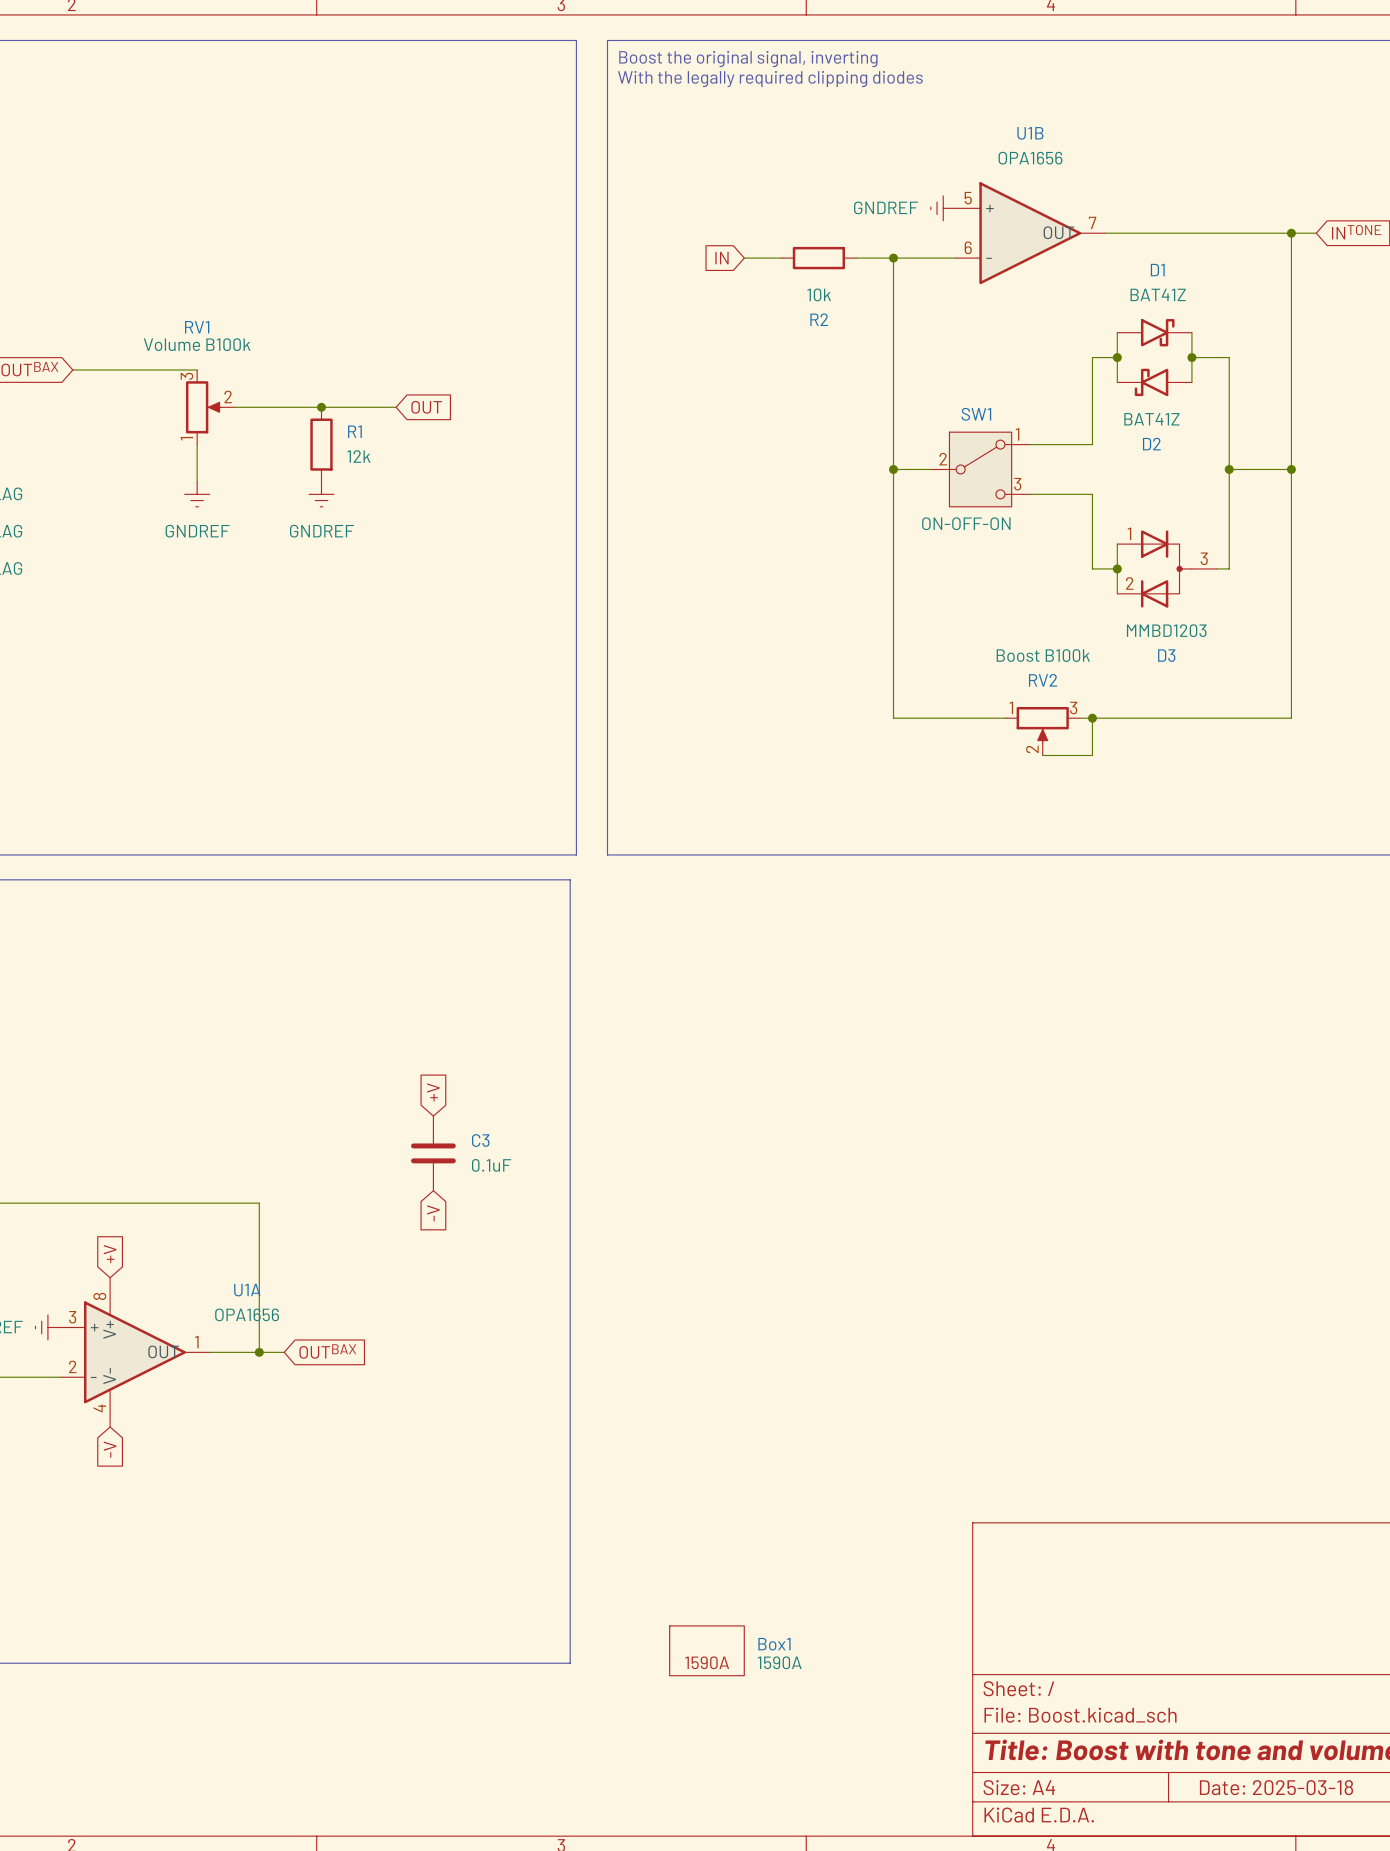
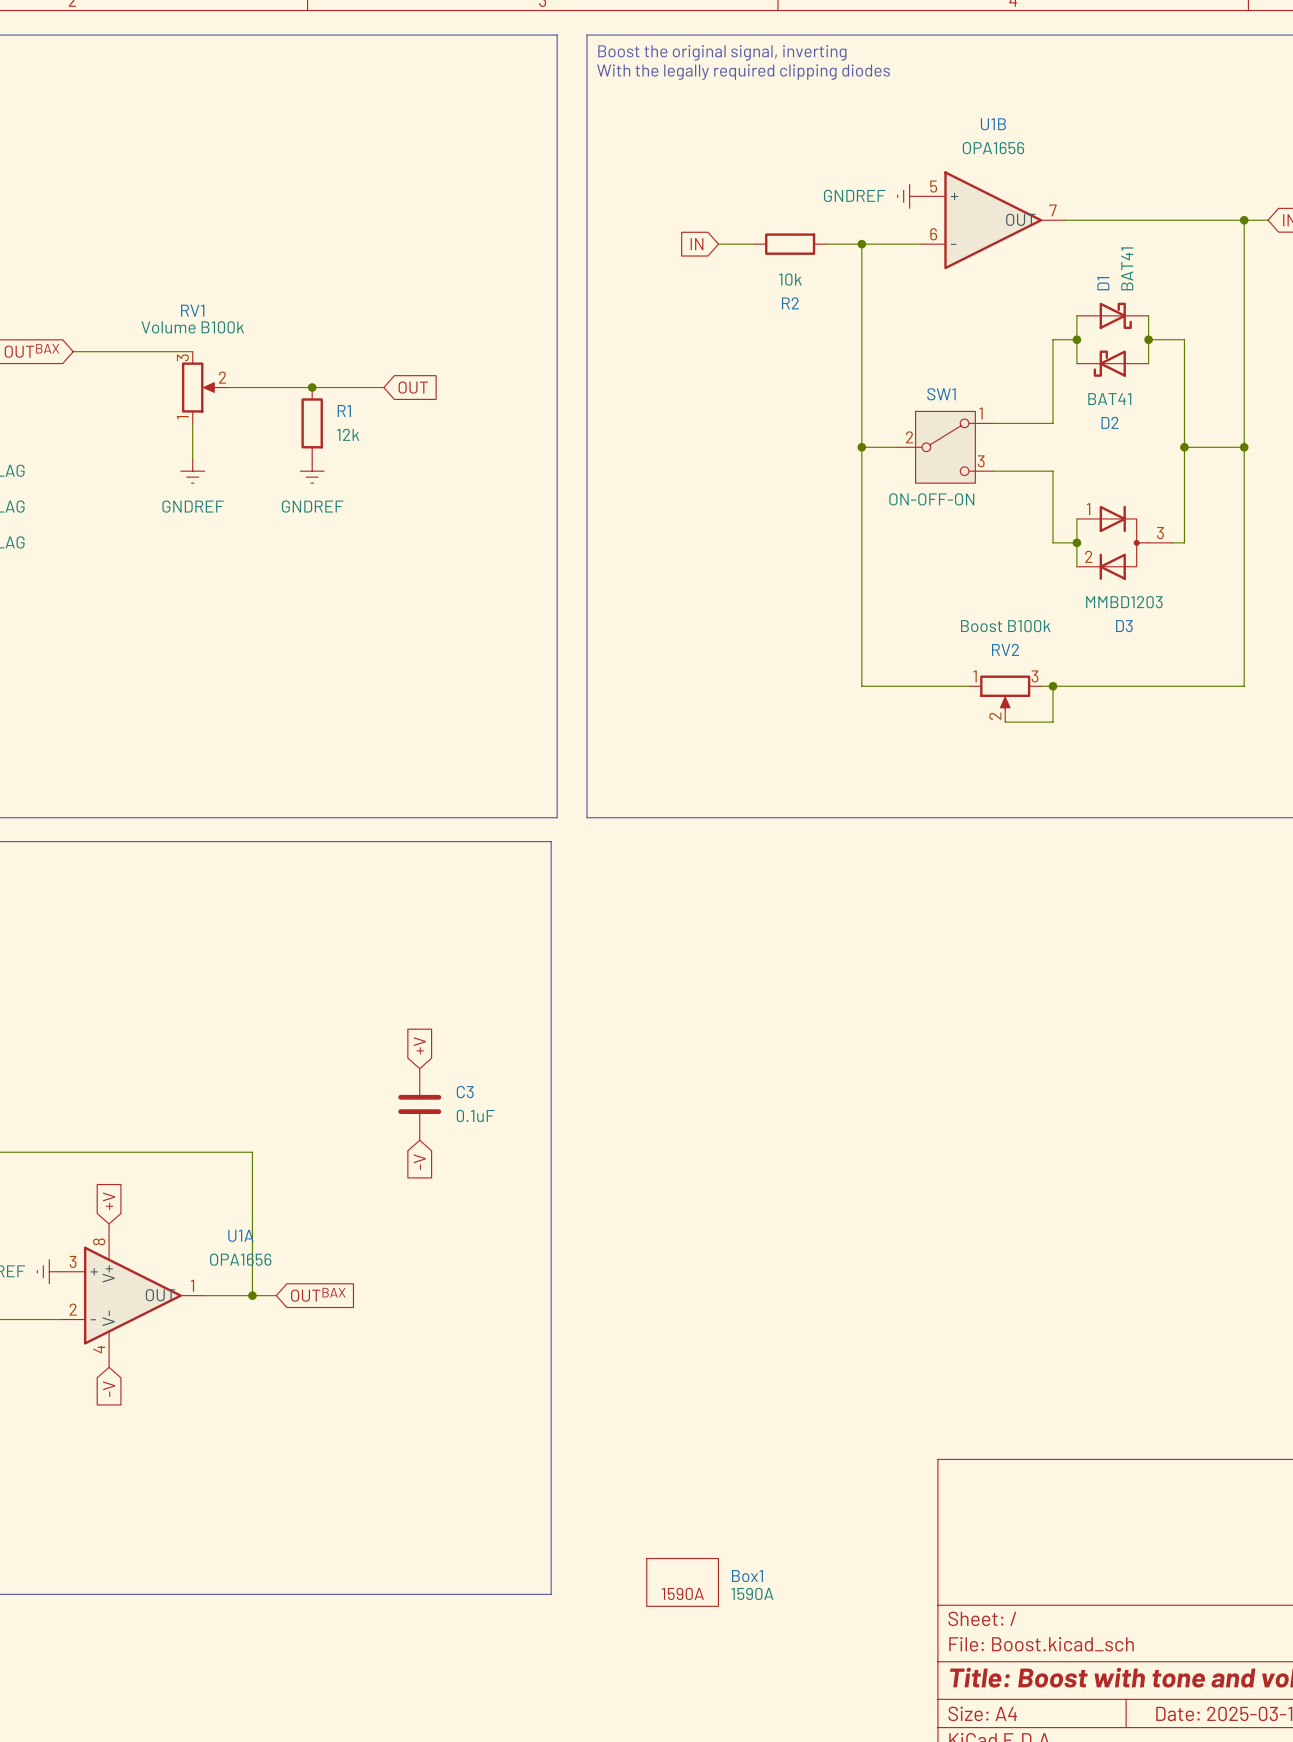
D1 name rotation: 0° (1157, 270) -> 90° counterclockwise (1103, 283)
D1 value: BAT41Z (1158, 294) -> BAT41 (1127, 268)
D1 symbol: [1117, 319, 1192, 347] -> [1076, 302, 1149, 329]
D2 symbol: [1117, 368, 1192, 397] -> [1076, 350, 1149, 377]
D2 value: BAT41Z (1151, 419) -> BAT41 (1109, 399)

